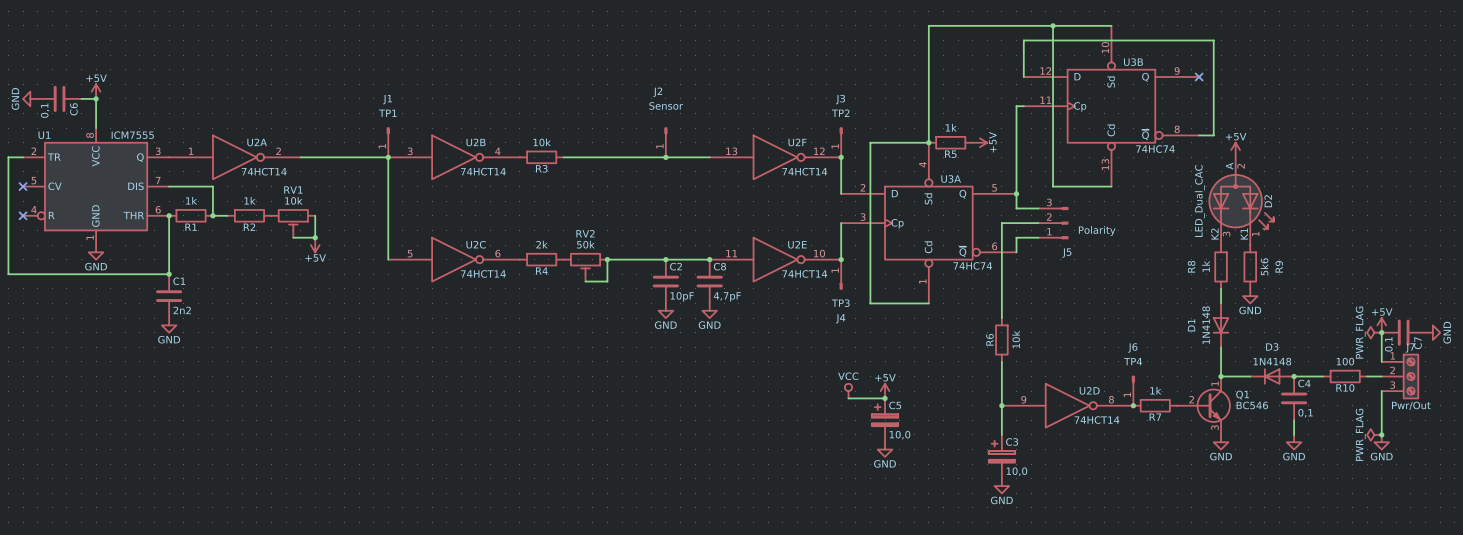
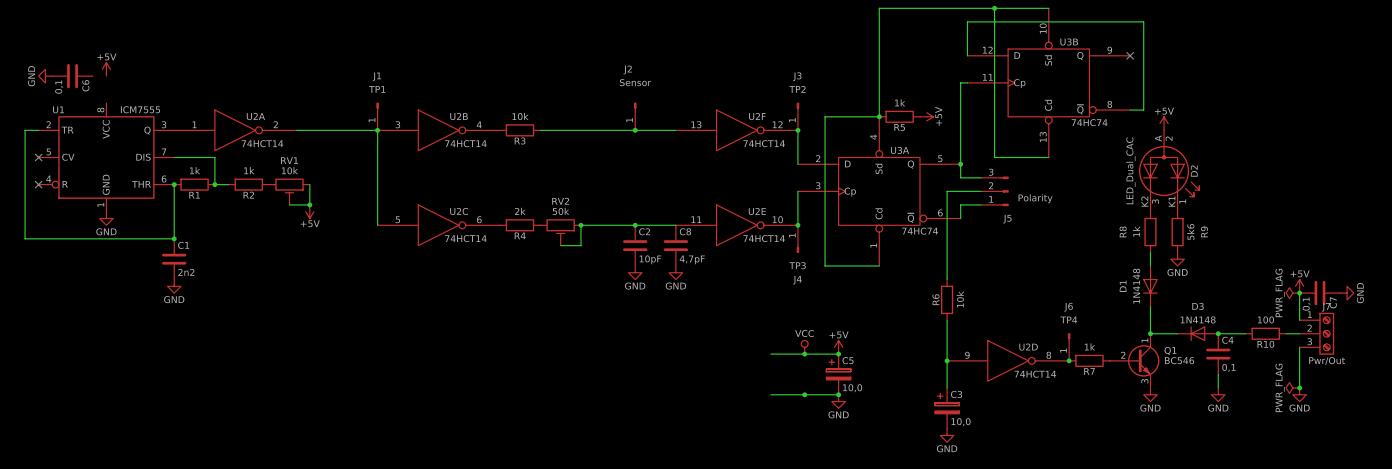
wire: (81, 98) (96, 98) (96, 128) -> none
junction: (96, 98) -> none
junction: (709, 259) -> none
wire: none -> (770, 354) (804, 354)
junction: none -> (804, 354)
wire: none -> (770, 394) (838, 394)
junction: none -> (804, 394)
junction: none -> (838, 394)

